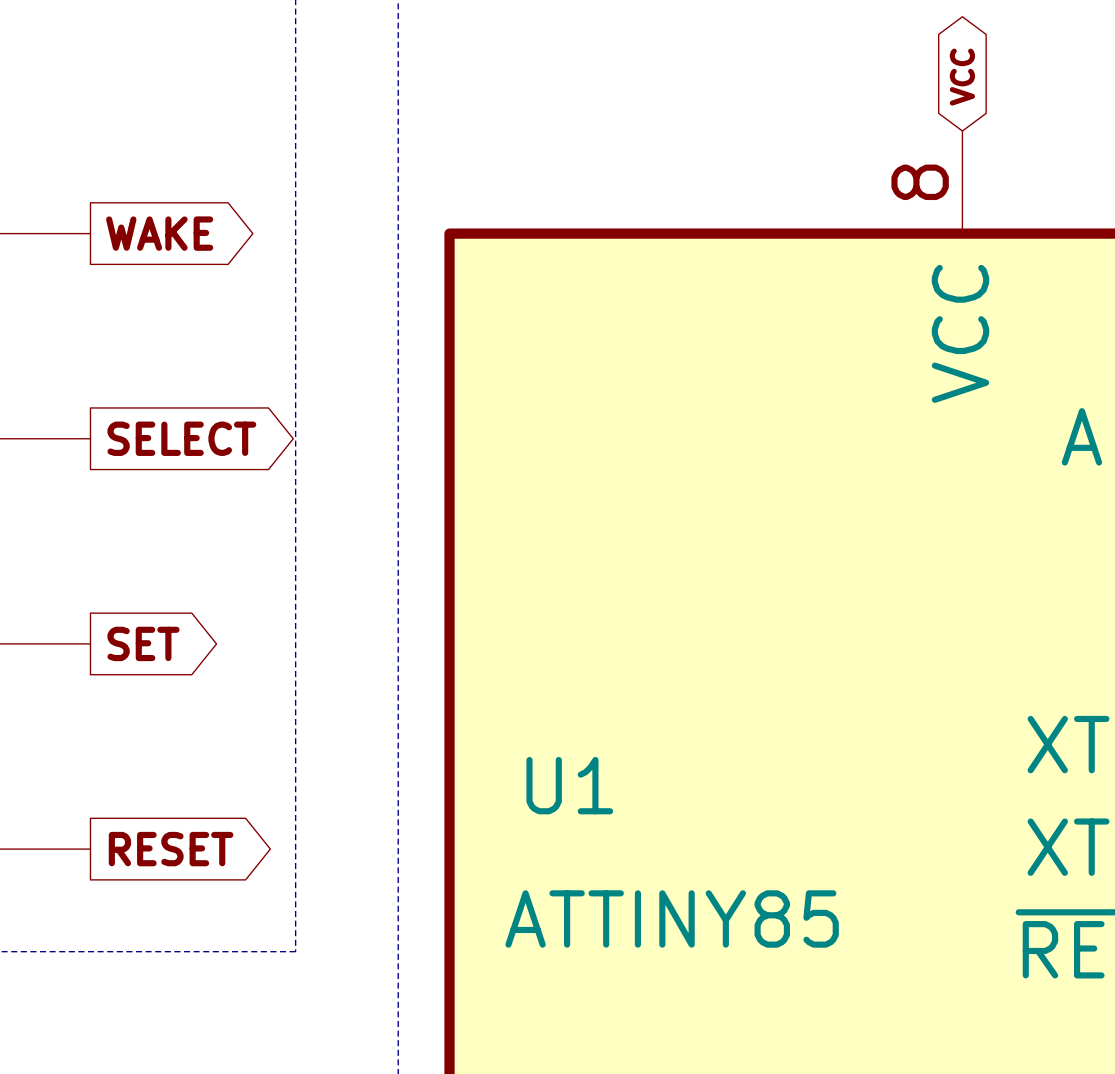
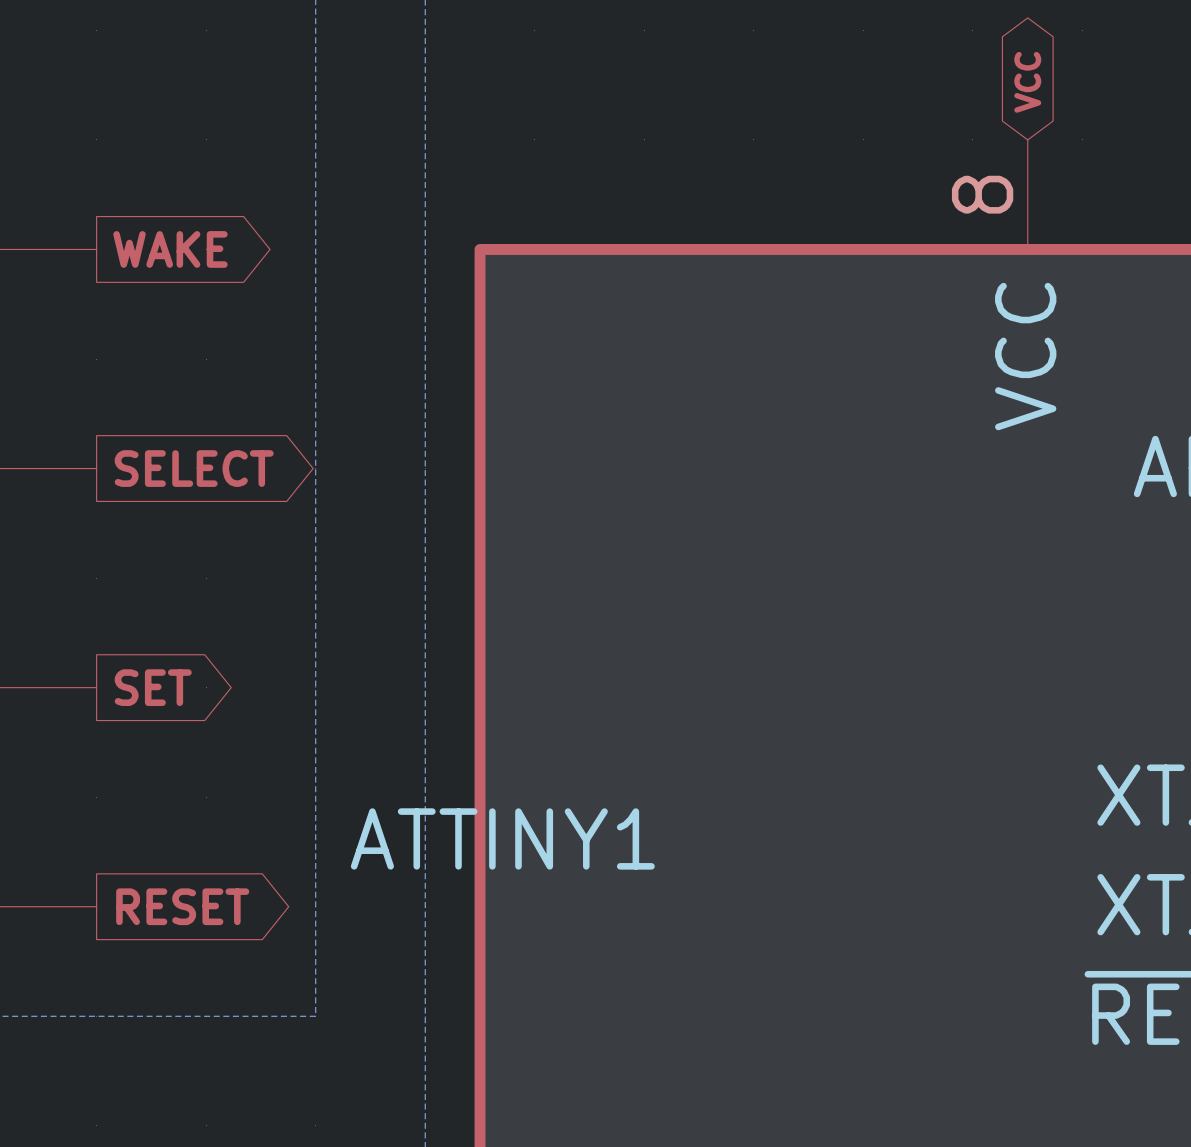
U1 name: U1 (569, 785) -> ATTINY1 (502, 838)
U1 value: ATTINY85 (672, 918) -> none

